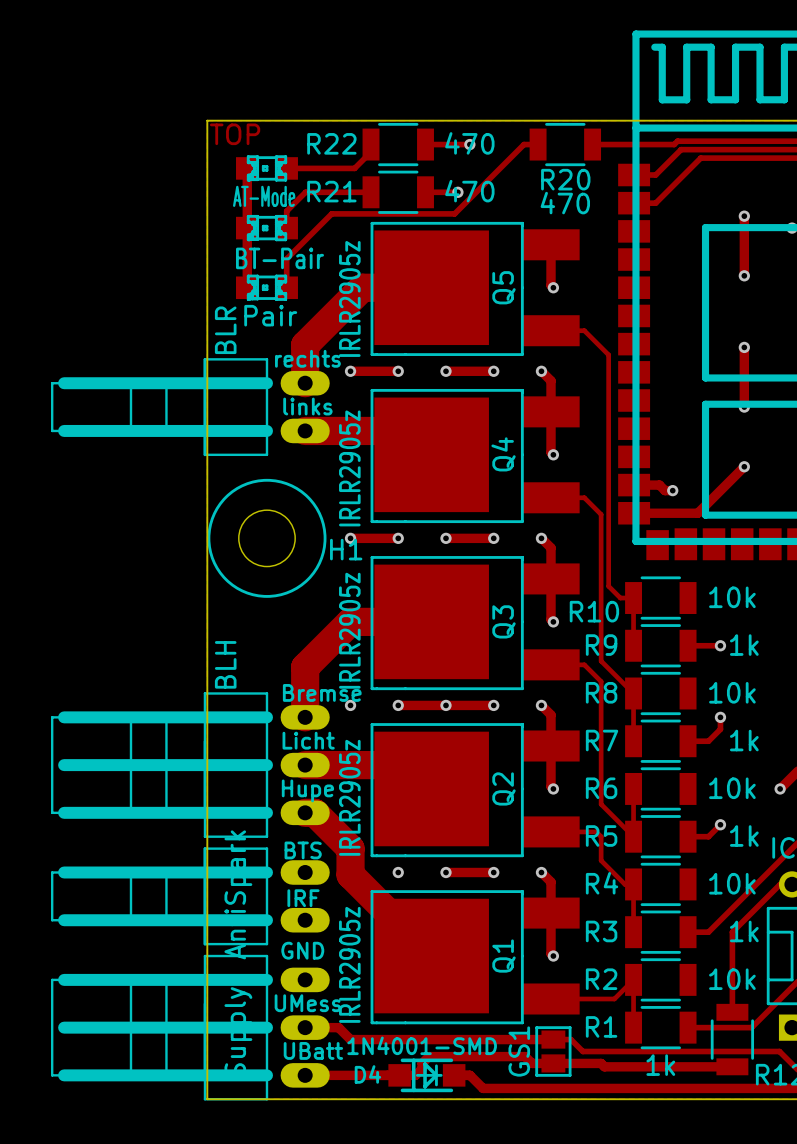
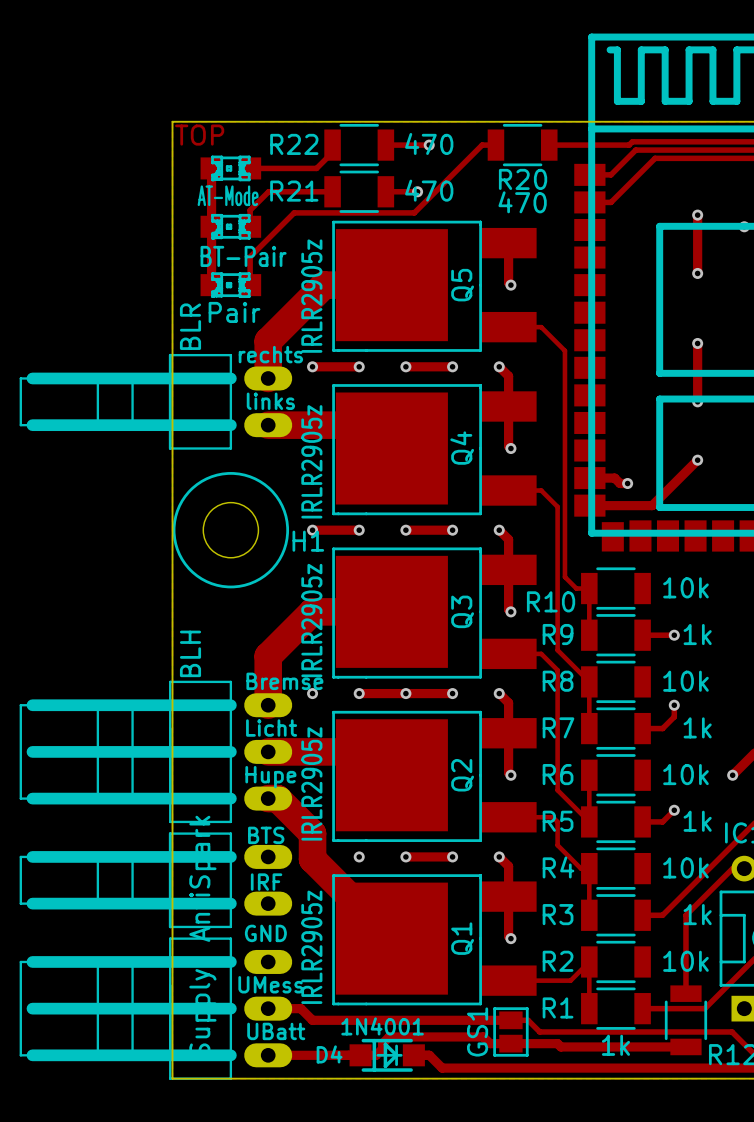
D4 value: 1N4001-SMD (422, 1045) -> 1N4001 (382, 1026)

